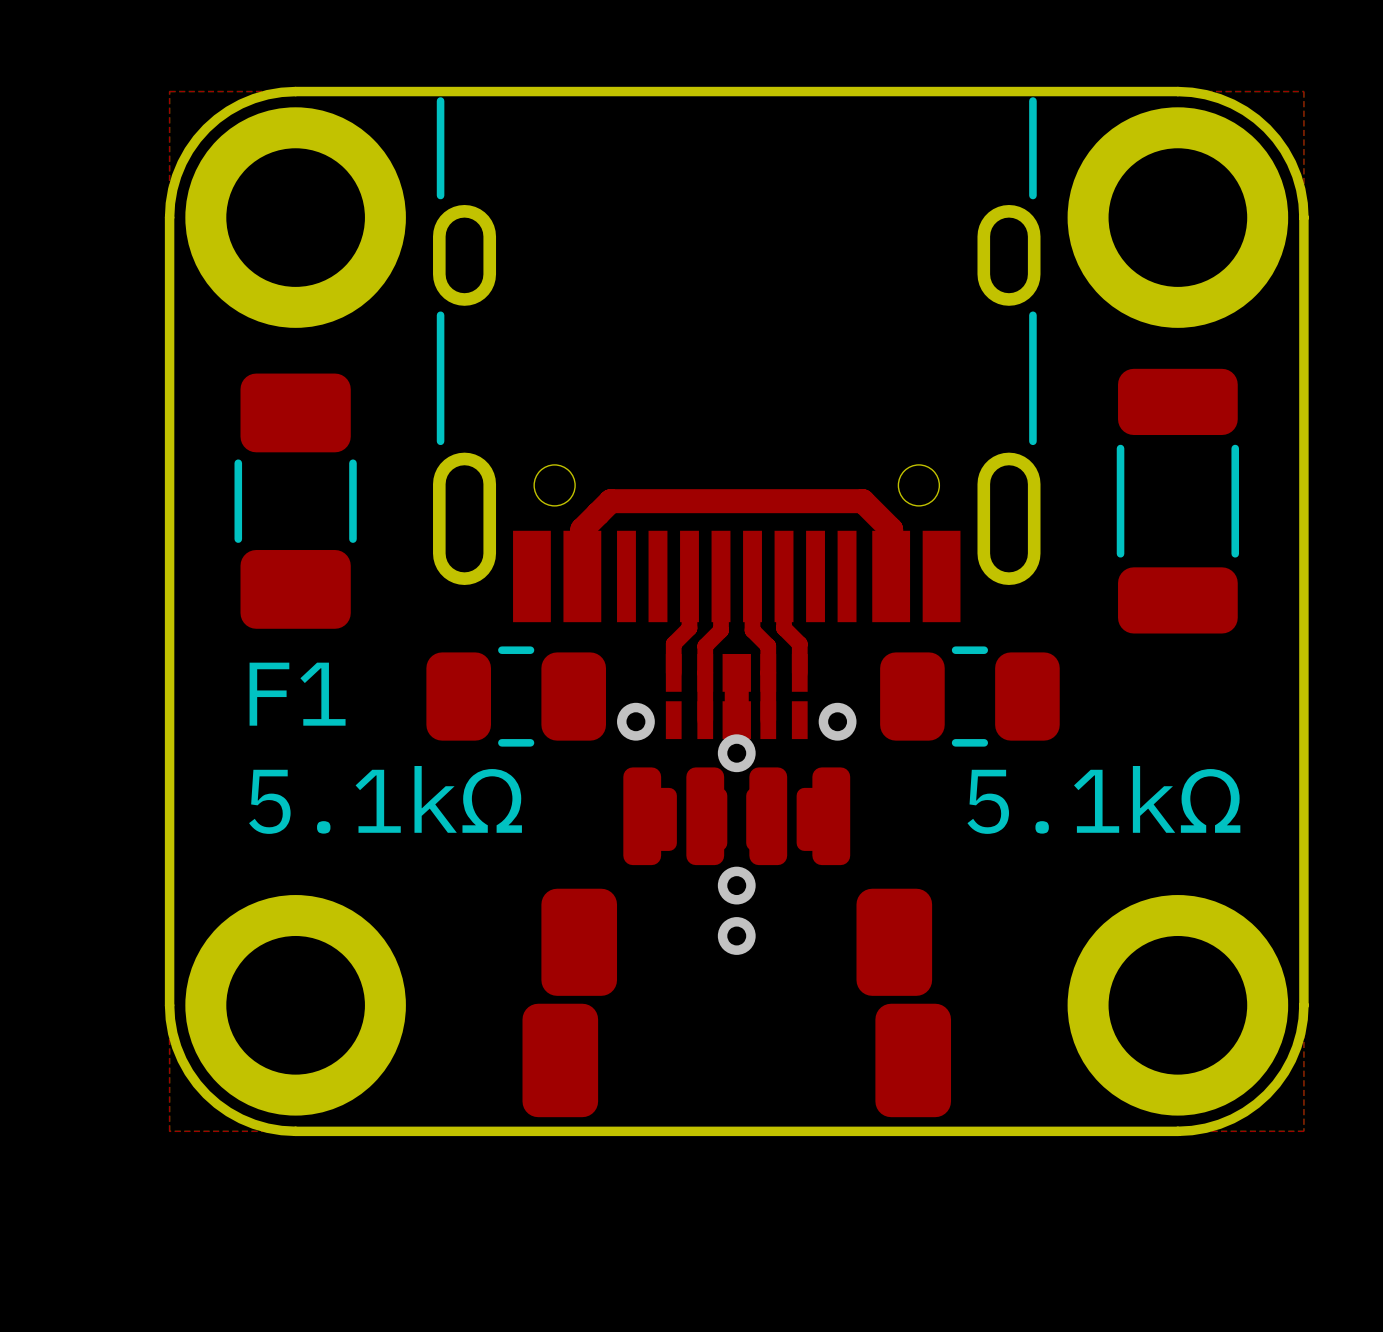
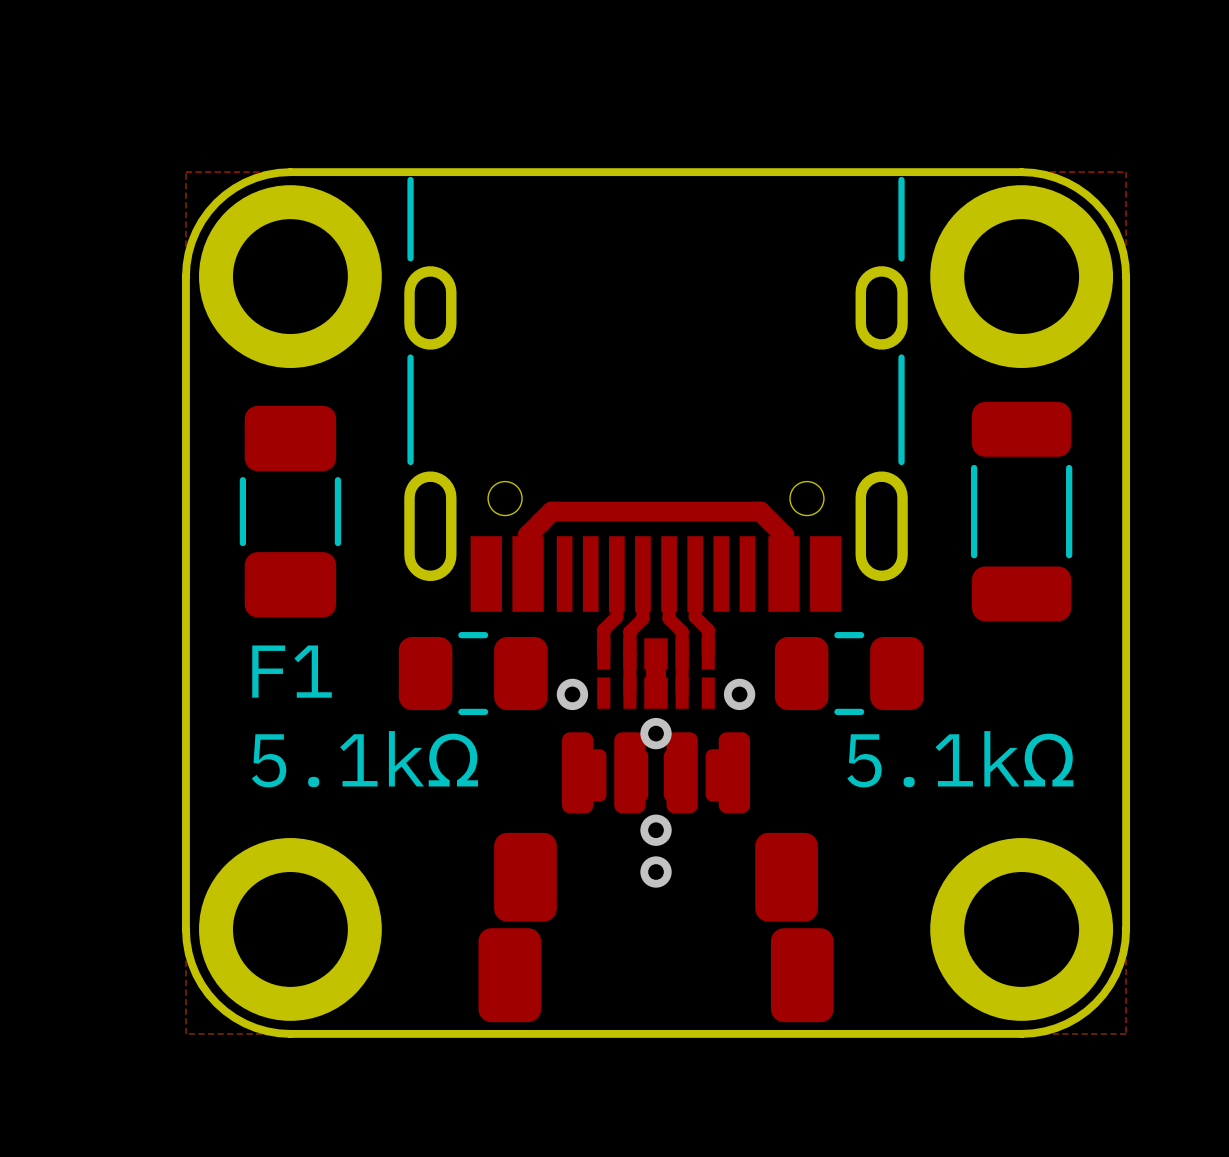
via position: (736, 753) -> (656, 733)

